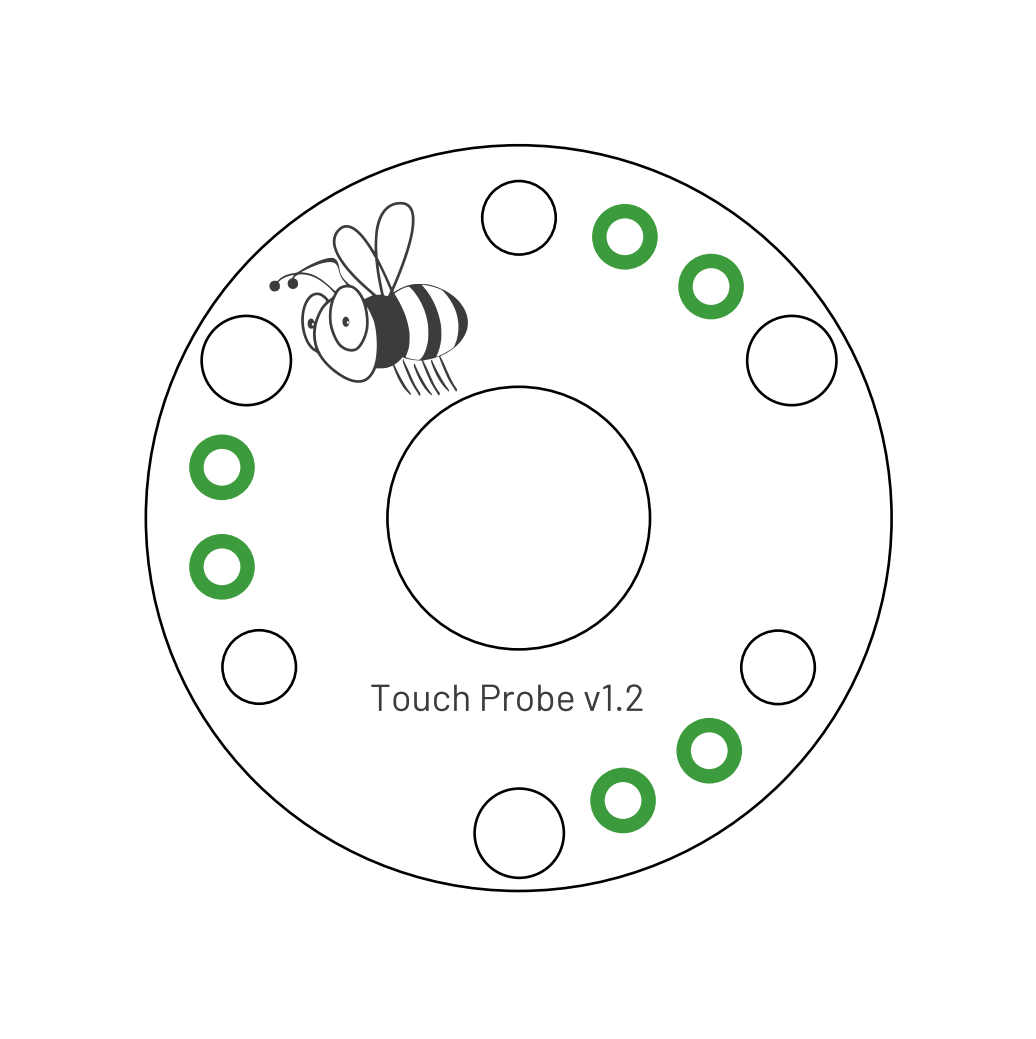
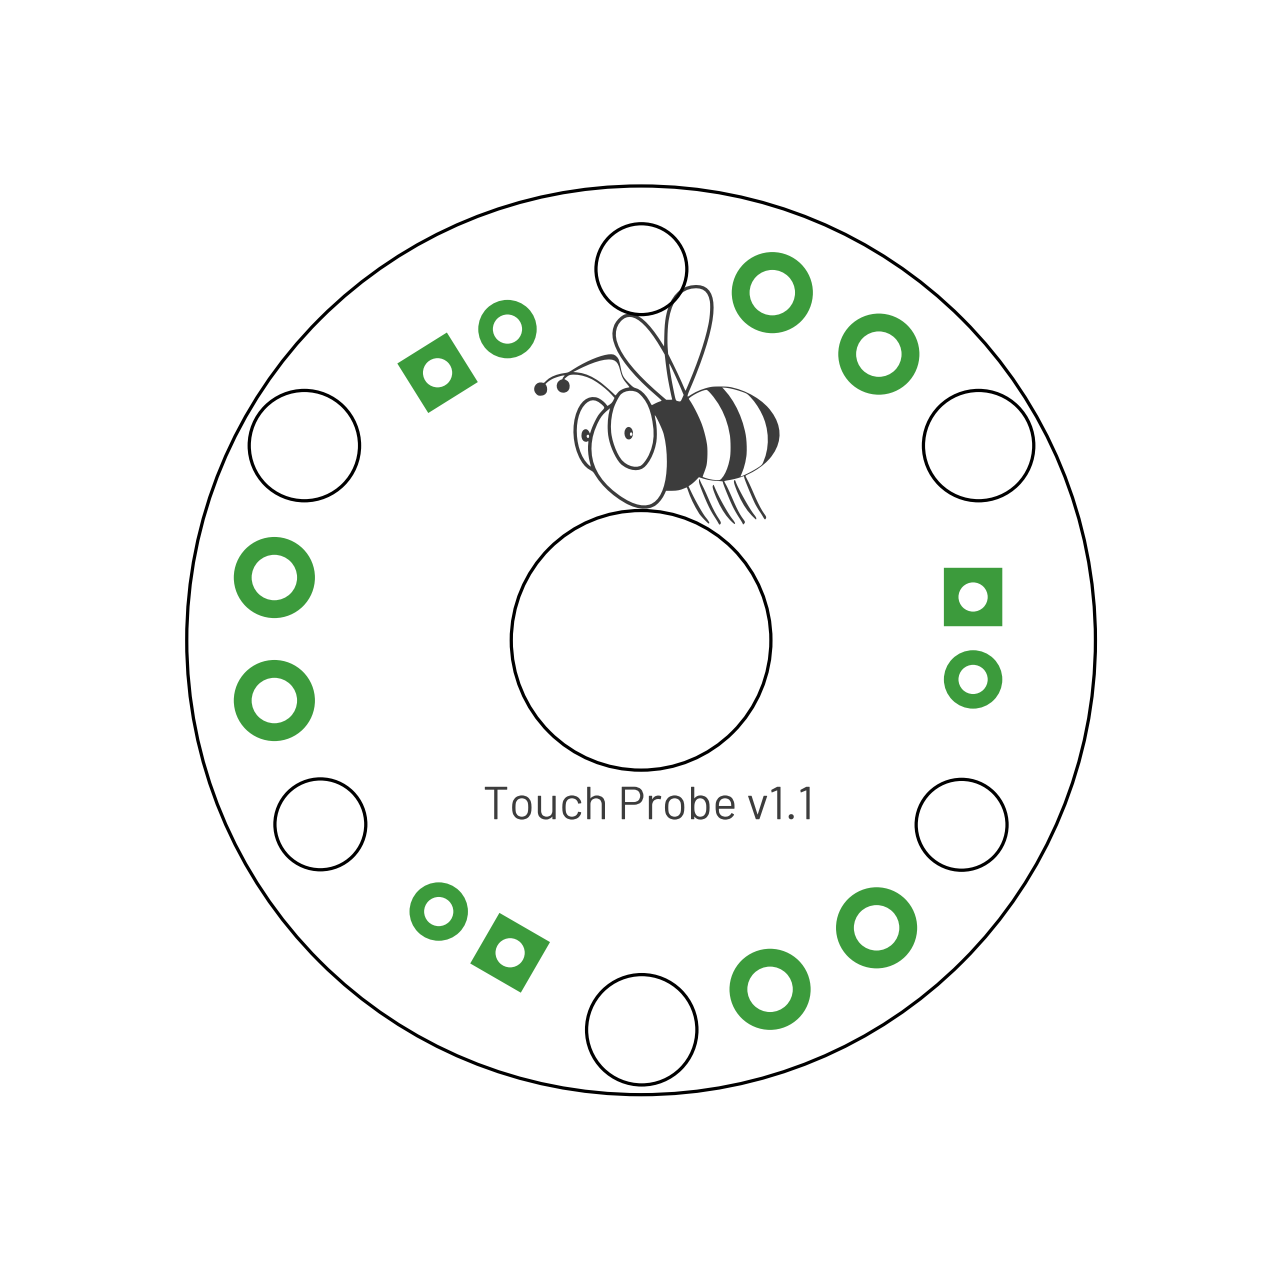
round board edge: [144, 143, 893, 893] -> none
round board edge: none -> [185, 184, 1098, 1097]
drawing: [269, 201, 468, 396] -> none
drawing: none -> [534, 284, 780, 525]
part: none -> (467, 356)
round board edge: [386, 385, 652, 651] -> none
round board edge: none -> [509, 508, 773, 772]
part: none -> (973, 638)
part: none -> (479, 937)

